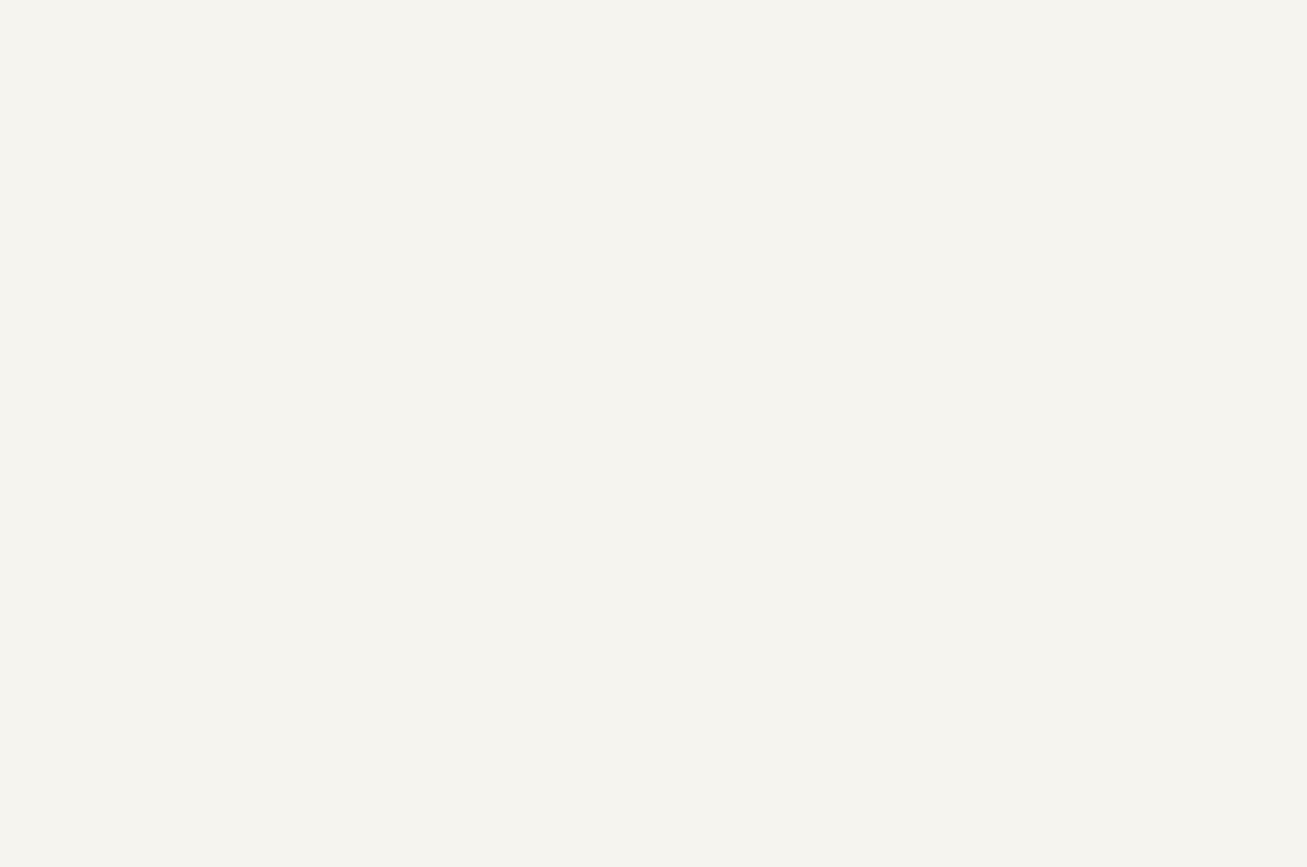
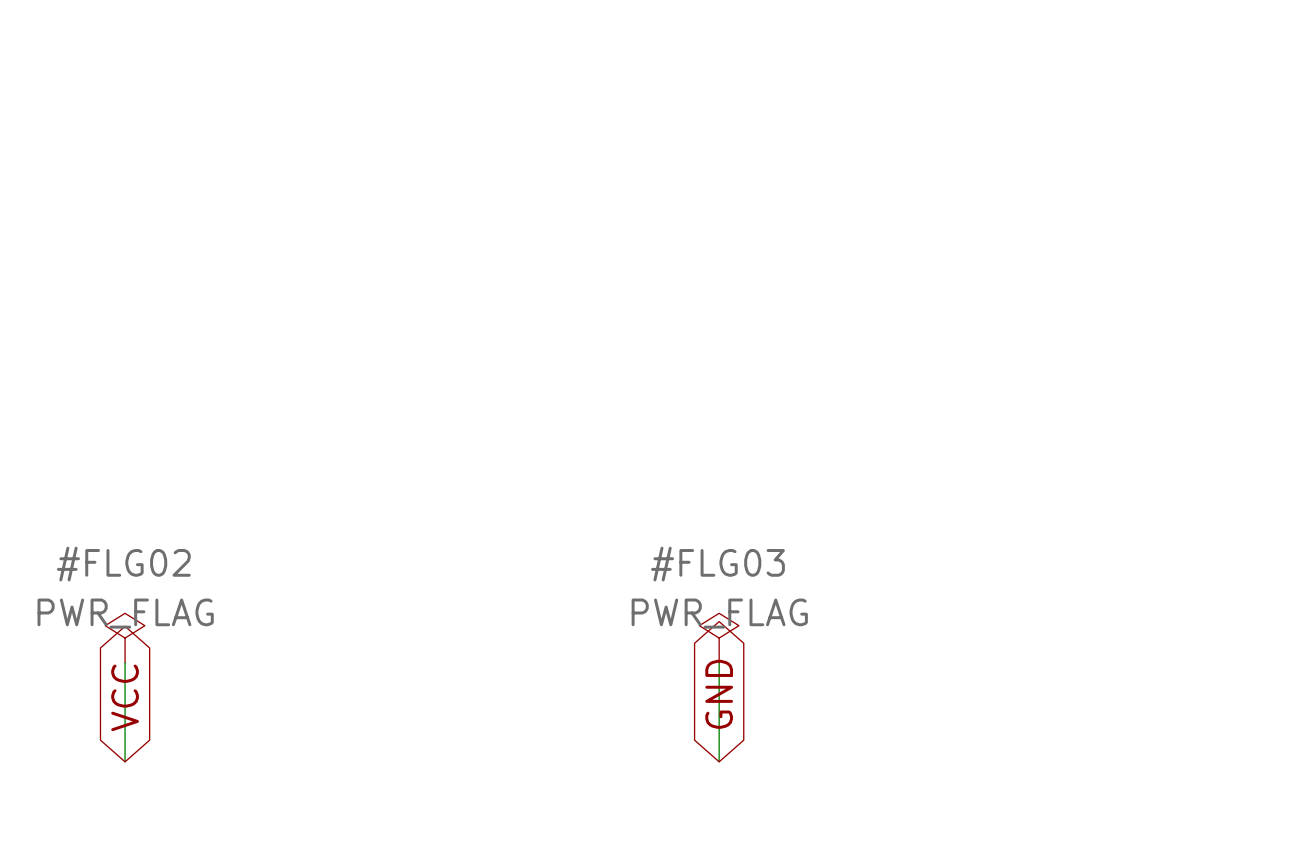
#FLG02: none -> PWR_FLAG (125, 638)
#FLG03: none -> PWR_FLAG (719, 638)
wire: none -> (125, 662) (125, 761)
wire: none -> (719, 662) (719, 761)
global label: none -> GND (719, 694)
global label: none -> VCC (125, 697)

